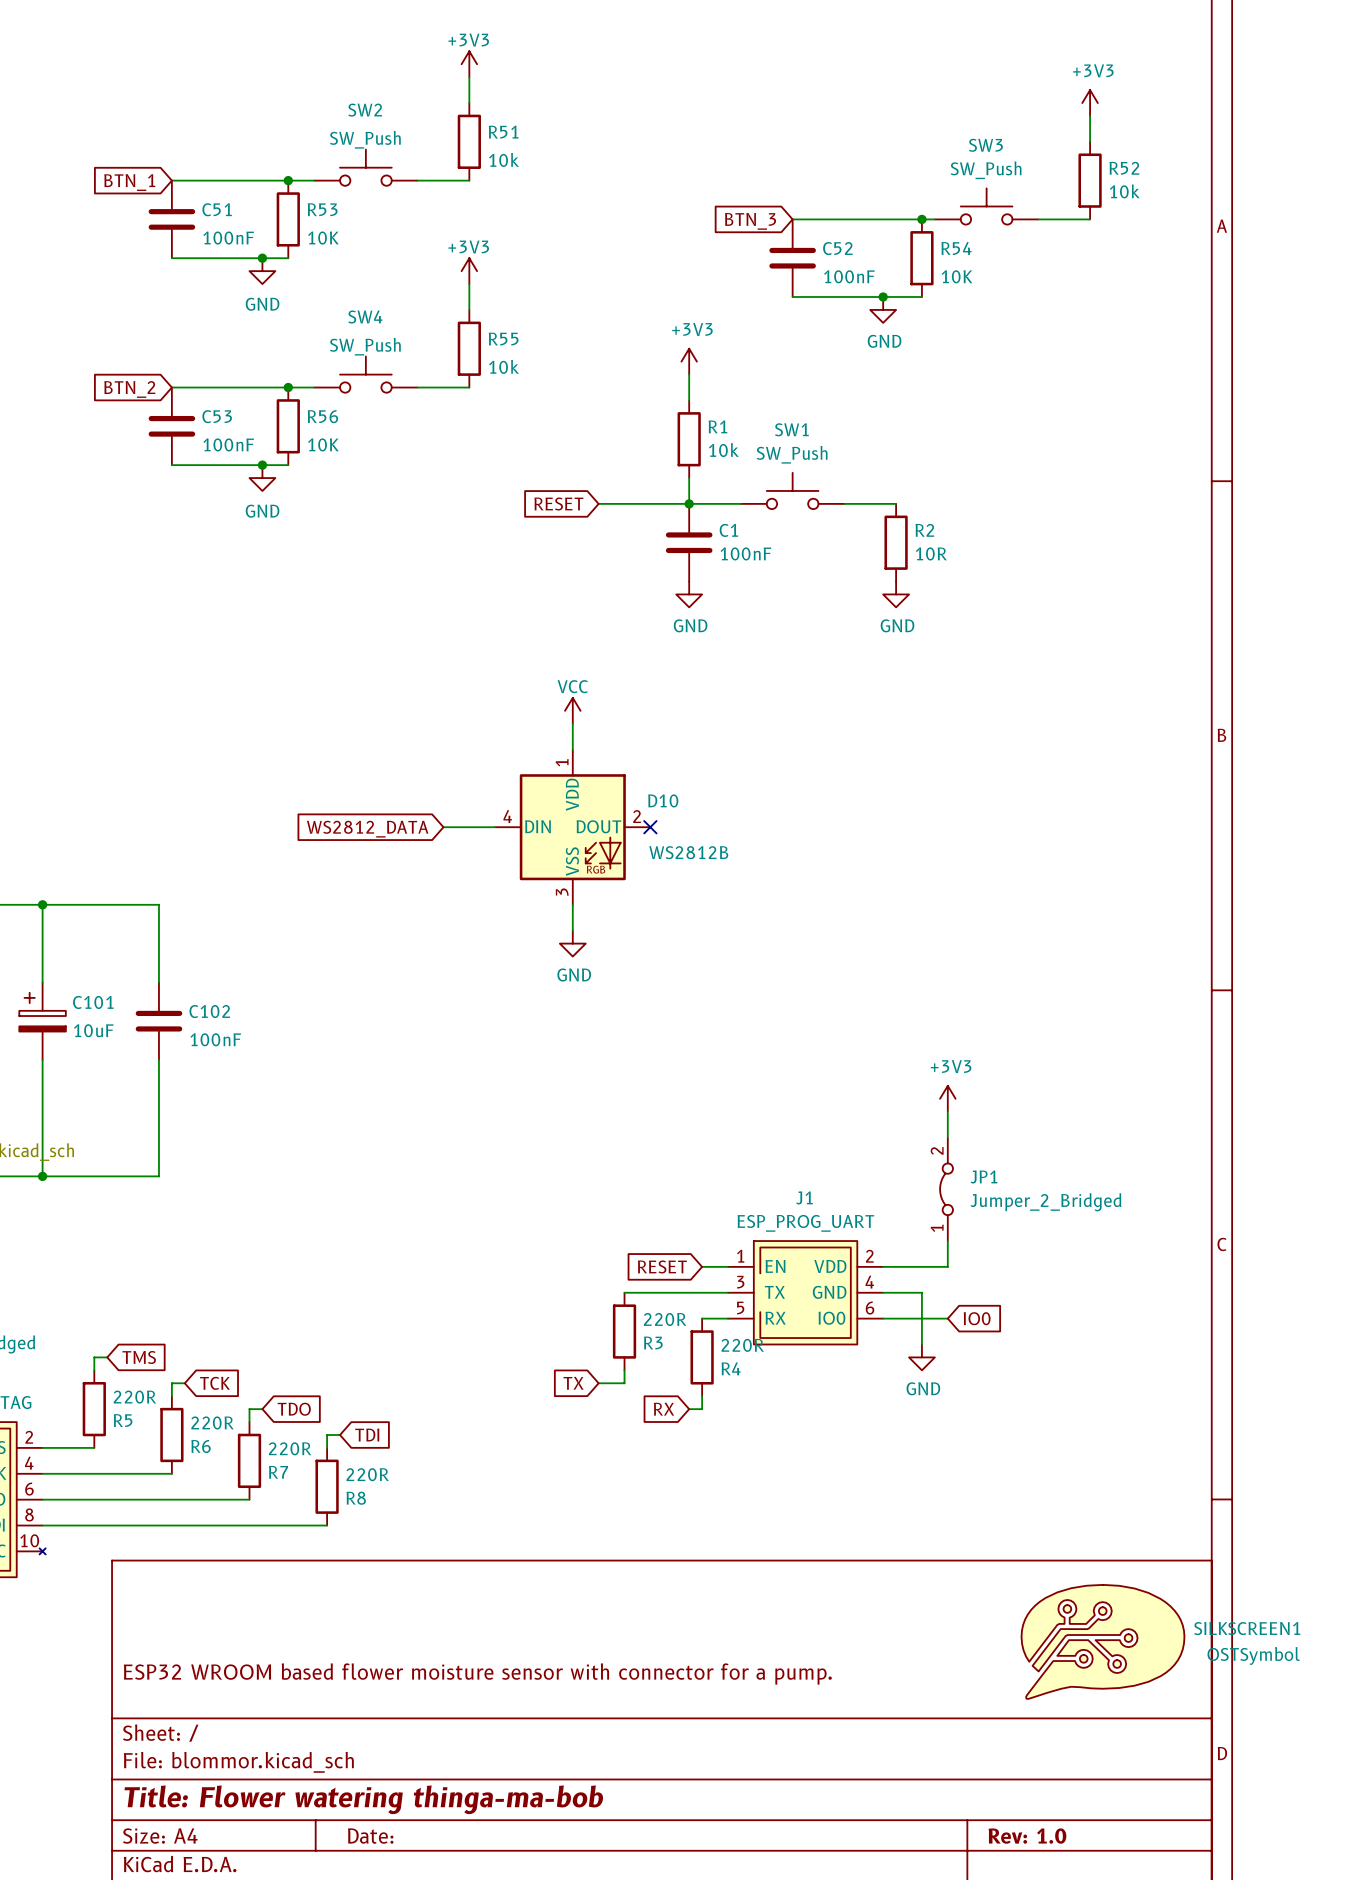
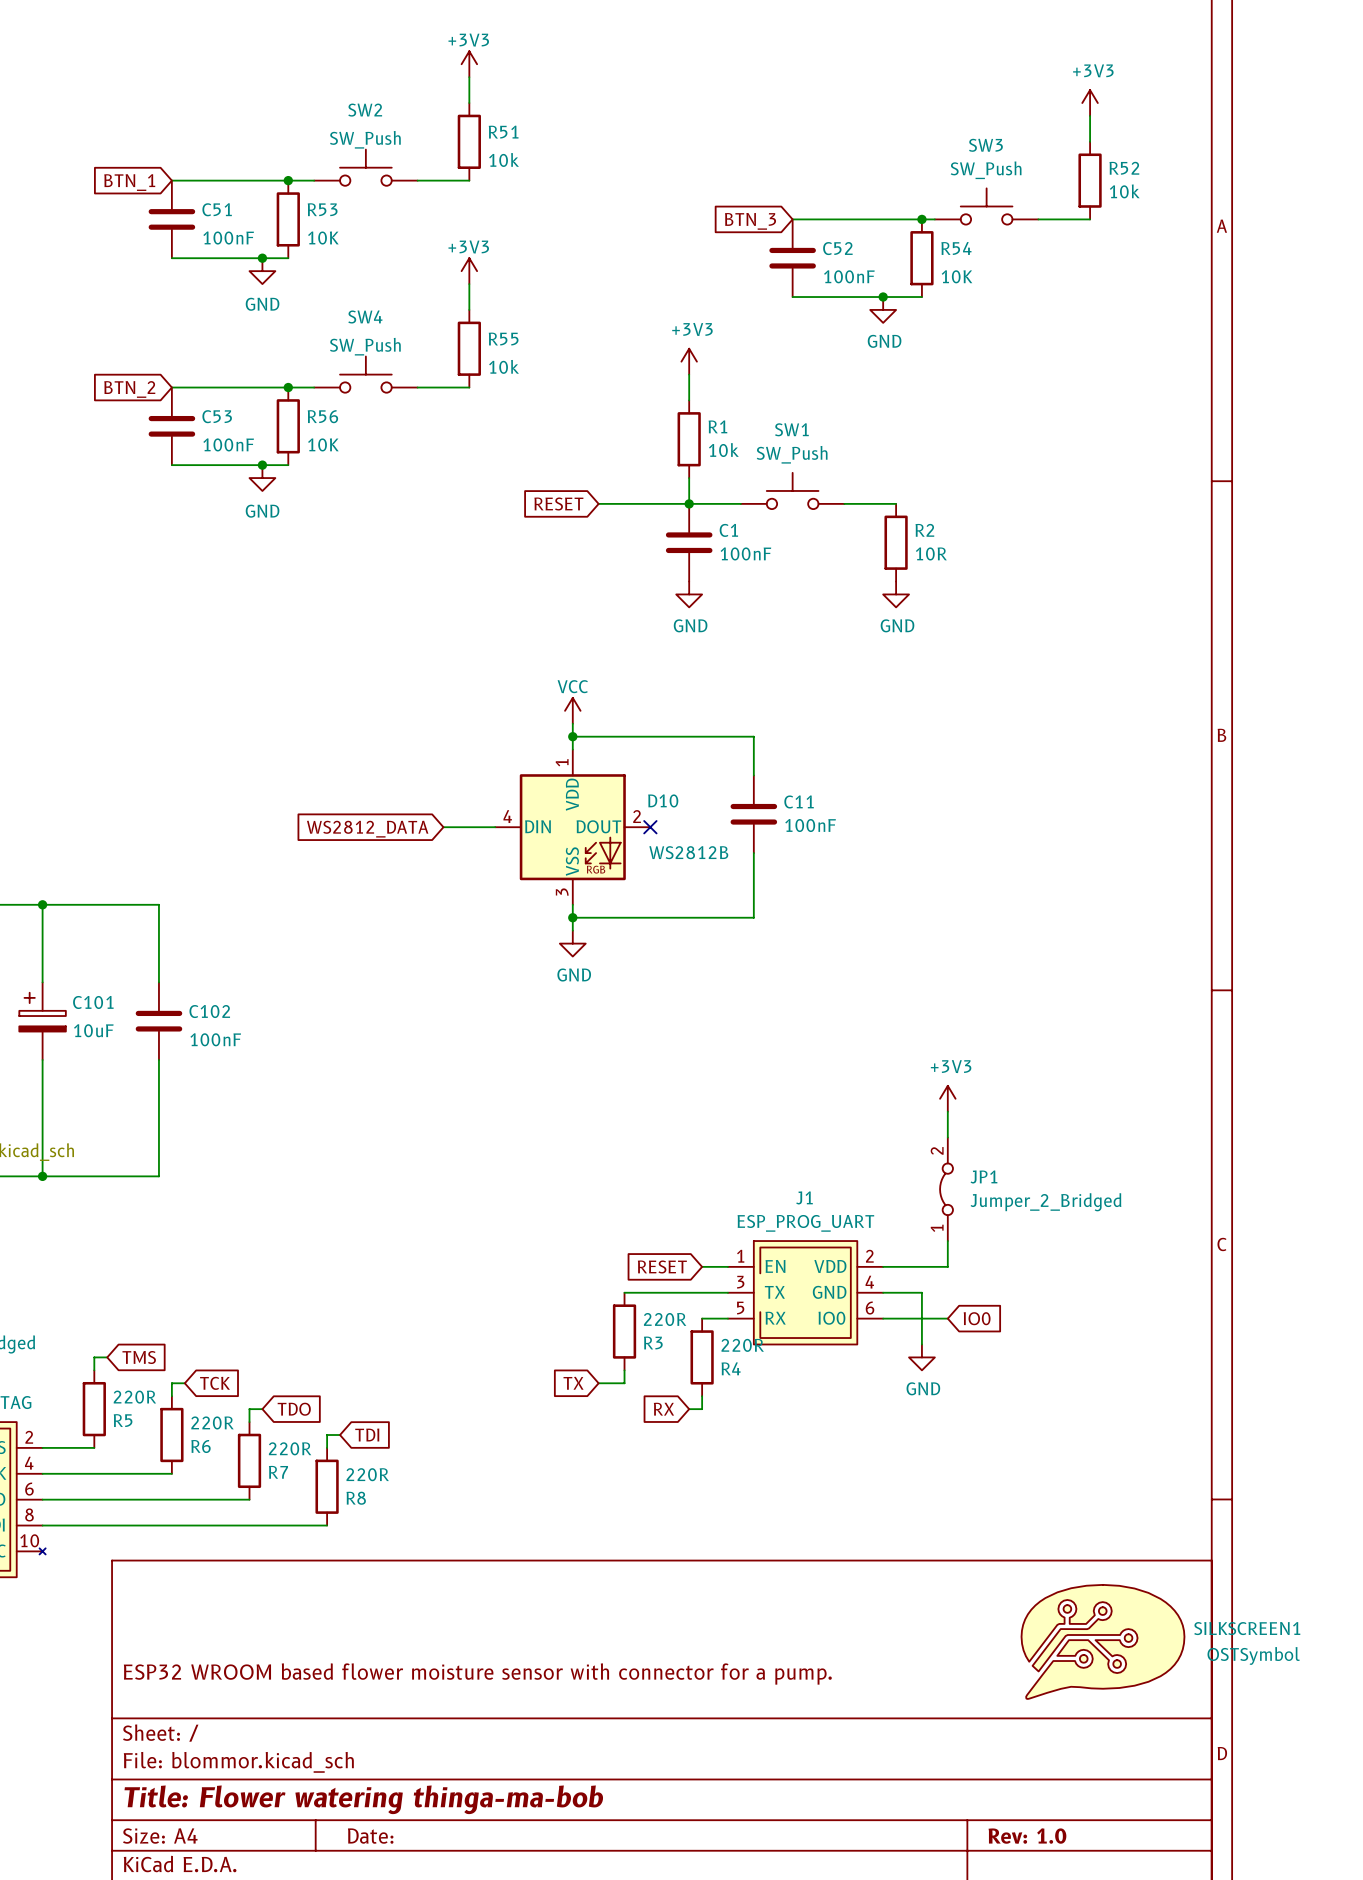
wire: none -> (572, 736) (753, 736) (753, 775)
junction: none -> (572, 736)
C11: none -> 100nF (753, 814)
wire: none -> (753, 853) (753, 917) (572, 917)
junction: none -> (572, 917)

